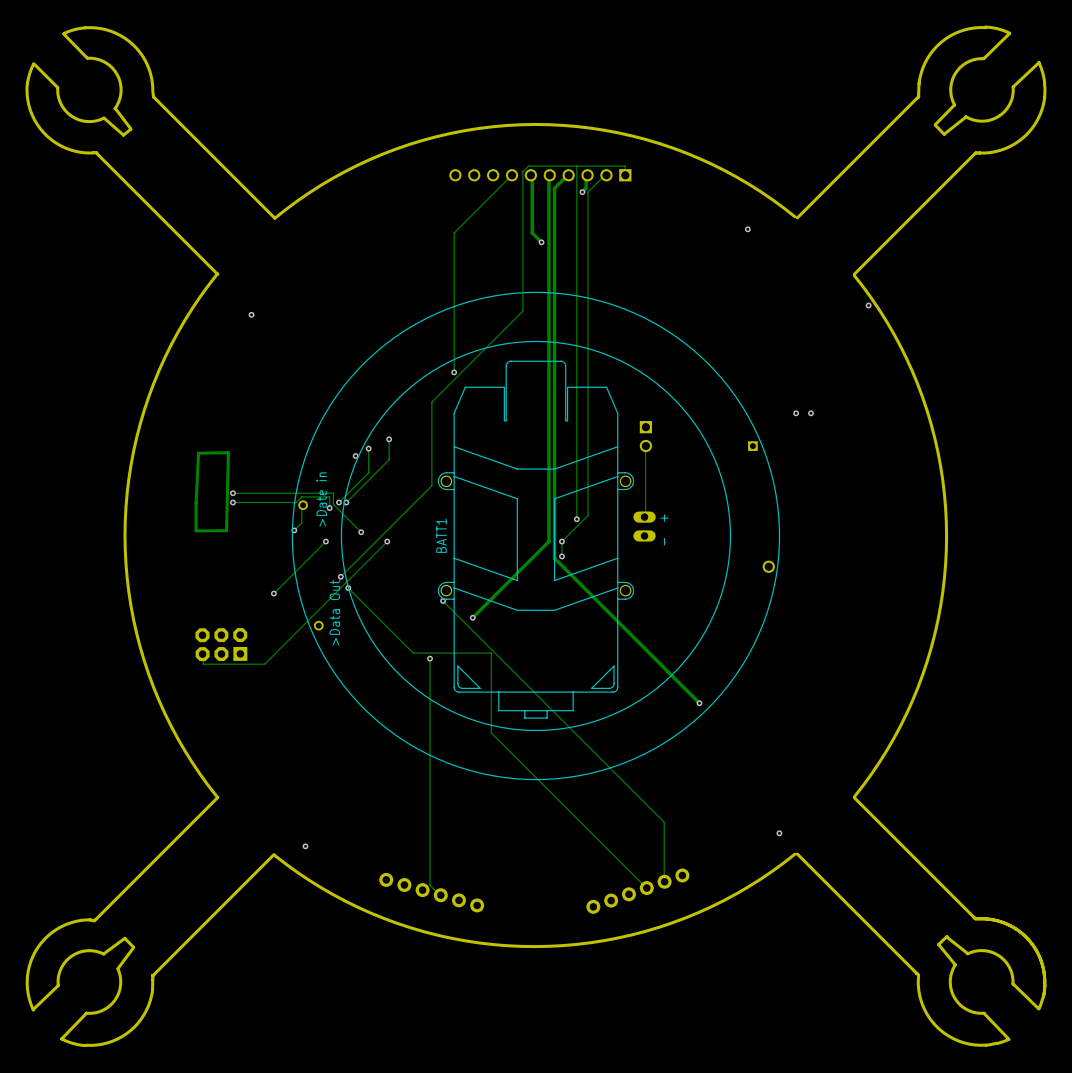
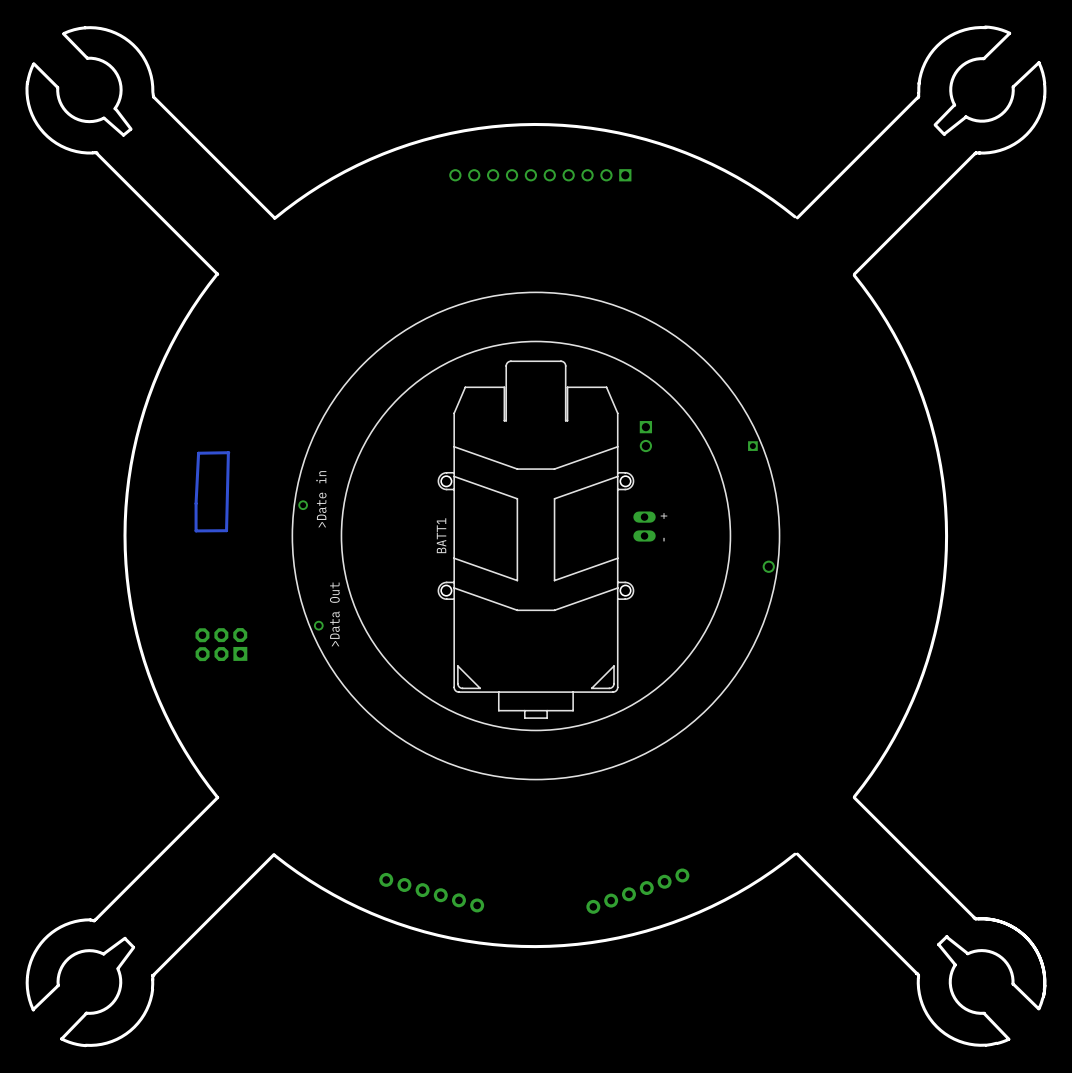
track: (576, 166) (576, 519) -> none
track: (512, 175) (454, 233) (454, 372) -> none
track: (530, 175) (532, 233) (541, 242) -> none
track: (549, 175) (548, 541) (472, 617) -> none
track: (568, 175) (554, 188) (554, 558) (699, 703) -> none
track: (587, 175) (586, 188) (582, 192) -> none
track: (606, 175) (587, 192) (587, 515) (561, 541) (561, 556) -> none
track: (625, 175) (625, 166) (528, 166) (522, 171) (522, 311) (431, 402) (431, 485) (340, 576) -> none
via: (582, 192) -> none
via: (747, 229) -> none
via: (541, 242) -> none
via: (868, 305) -> none
via: (251, 314) -> none
via: (454, 372) -> none
via: (796, 413) -> none
via: (811, 413) -> none
track: (389, 439) (389, 459) (346, 502) -> none
via: (389, 439) -> none
track: (645, 446) (644, 517) -> none
track: (368, 448) (368, 472) (338, 502) -> none
via: (368, 448) -> none
via: (355, 456) -> none
track: (233, 493) (333, 493) (333, 504) (361, 532) -> none
via: (233, 493) -> none
track: (233, 502) (296, 502) (301, 496) (329, 496) (329, 508) -> none
via: (233, 502) -> none
via: (338, 502) -> none
via: (346, 502) -> none
track: (303, 505) (301, 522) (294, 530) -> none
via: (329, 508) -> none
via: (576, 519) -> none
via: (294, 530) -> none
via: (361, 532) -> none
track: (325, 541) (273, 593) -> none
via: (325, 541) -> none
track: (387, 541) (264, 664) (203, 664) (202, 654) -> none
via: (387, 541) -> none
via: (561, 541) -> none
via: (561, 556) -> none
via: (340, 576) -> none
track: (348, 588) (413, 653) (491, 653) (491, 732) (646, 888) -> none
via: (348, 588) -> none
via: (273, 593) -> none
track: (443, 601) (664, 822) (664, 881) -> none
via: (443, 601) -> none
via: (472, 617) -> none
track: (430, 658) (430, 885) (440, 895) -> none
via: (430, 658) -> none
via: (699, 703) -> none
via: (779, 833) -> none
via: (305, 846) -> none

